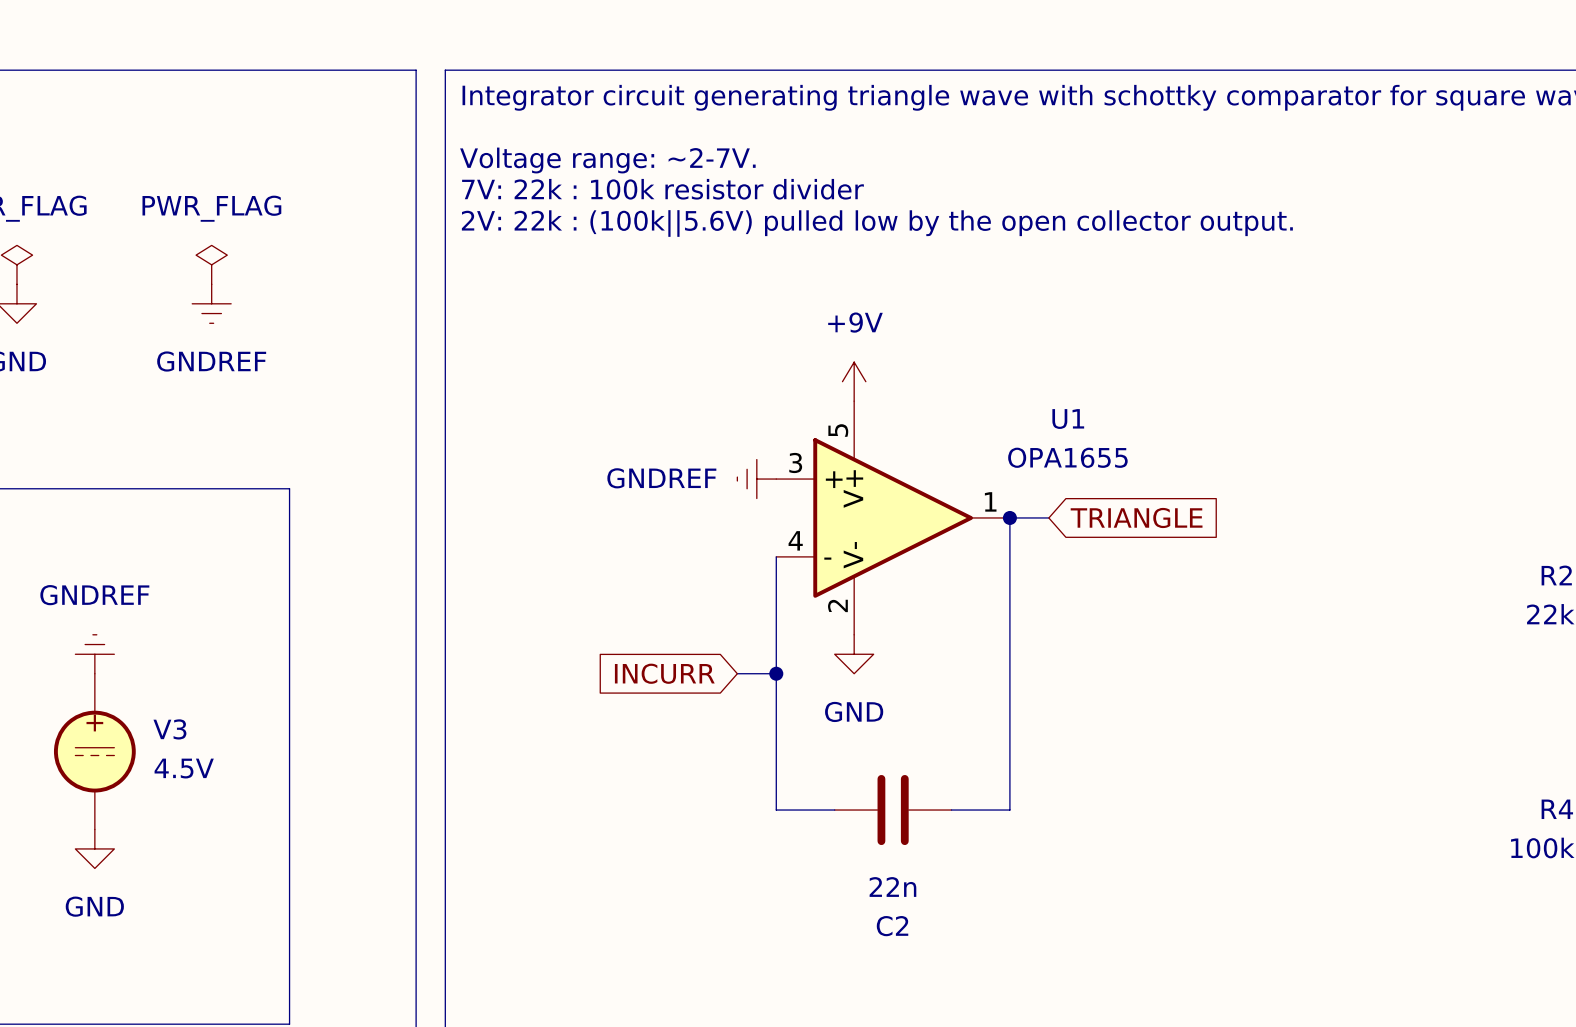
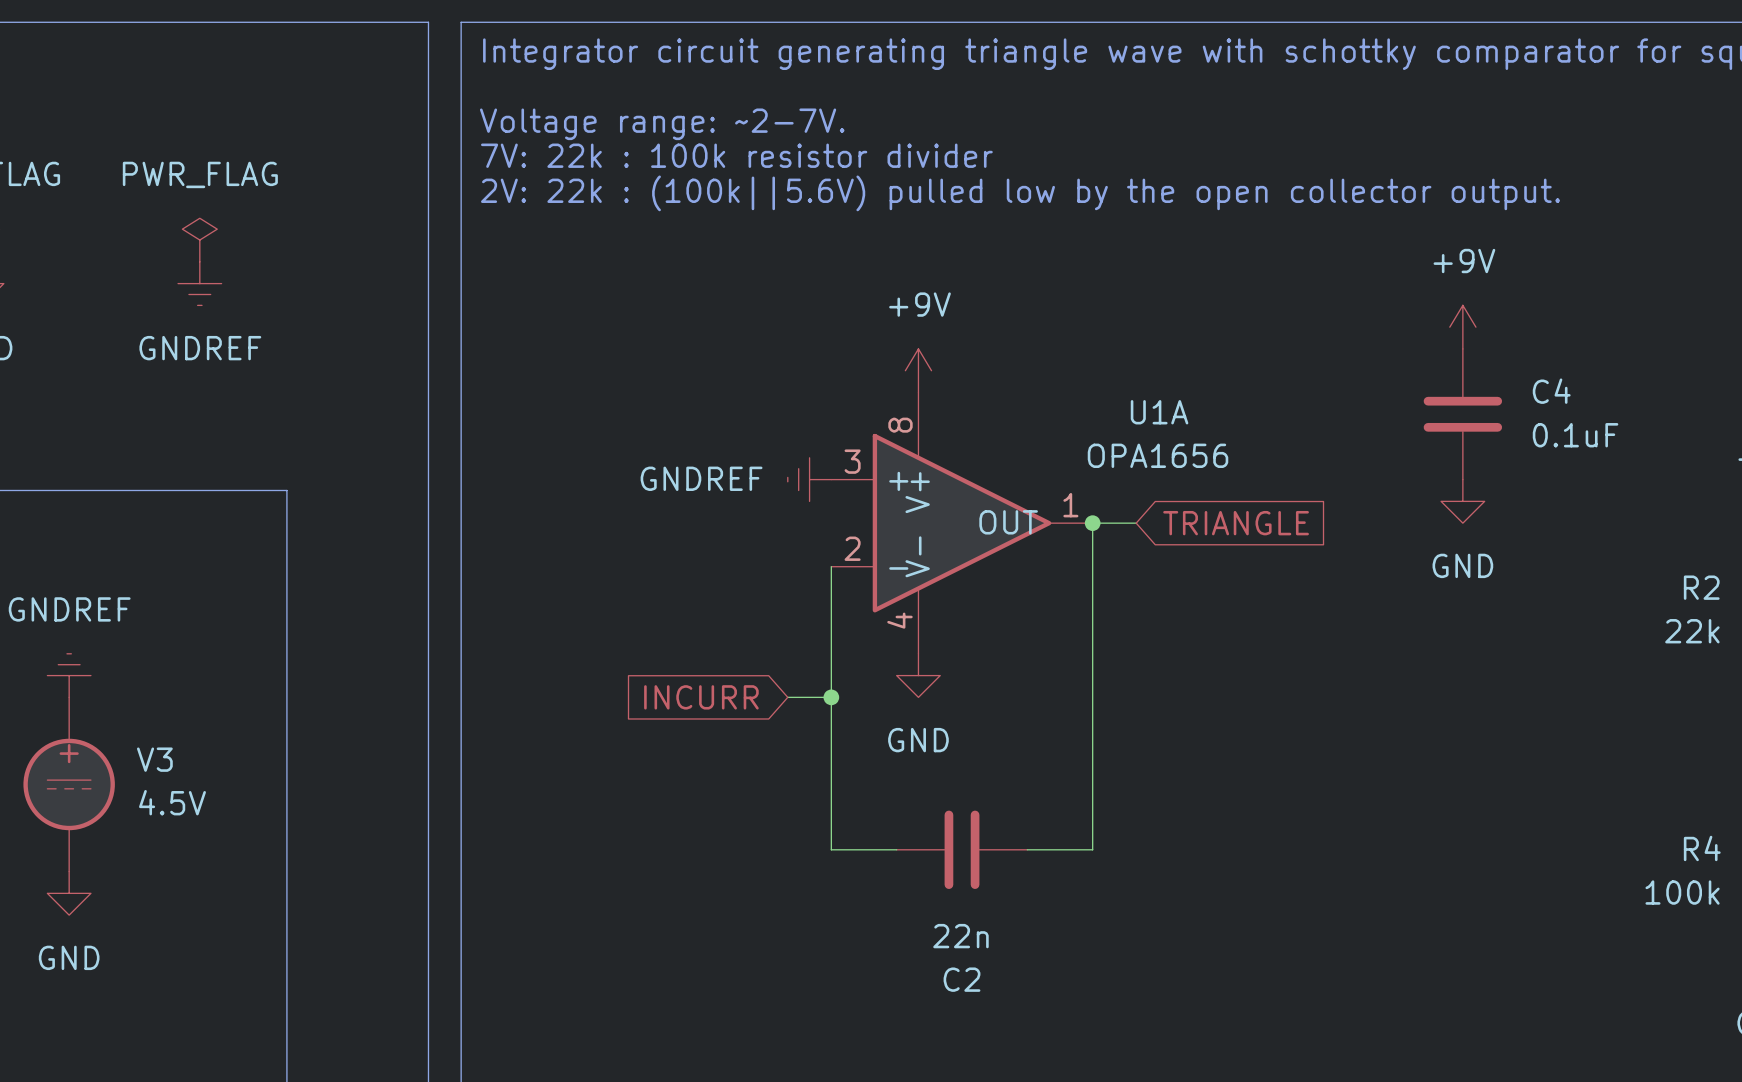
power symbol: none -> +9V (1462, 327)
U1 name: U1 (1068, 419) -> U1A (1159, 412)
C4: none -> 0.1uF (1462, 414)
U1 pin number: 5 (838, 430) -> 8 (900, 425)
U1 value: OPA1655 (1067, 457) -> OPA1656 (1157, 455)
power symbol: none -> GND (1462, 501)
U1 pin name: none -> OUT (1008, 522)
U1 pin number: 4 (795, 540) -> 2 (852, 548)
U1 pin number: 2 (837, 605) -> 4 (899, 620)

